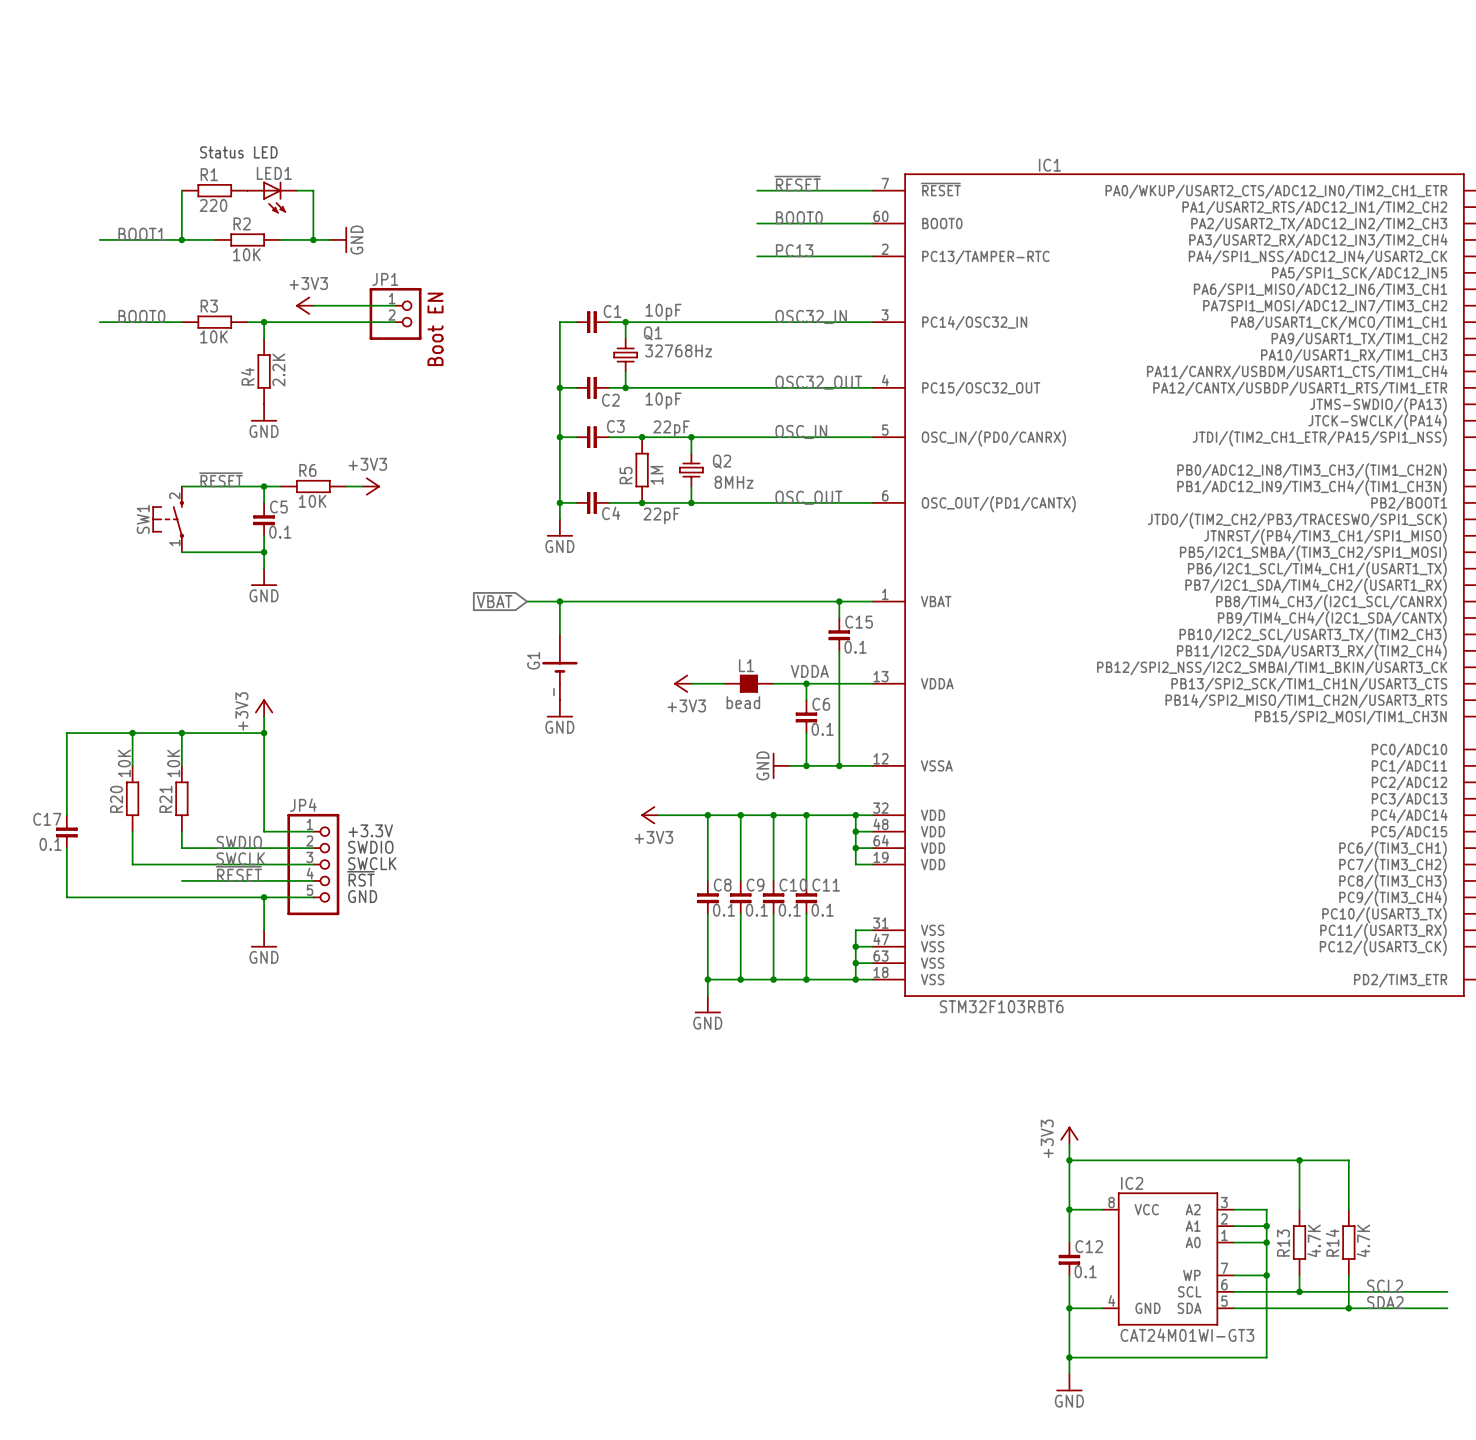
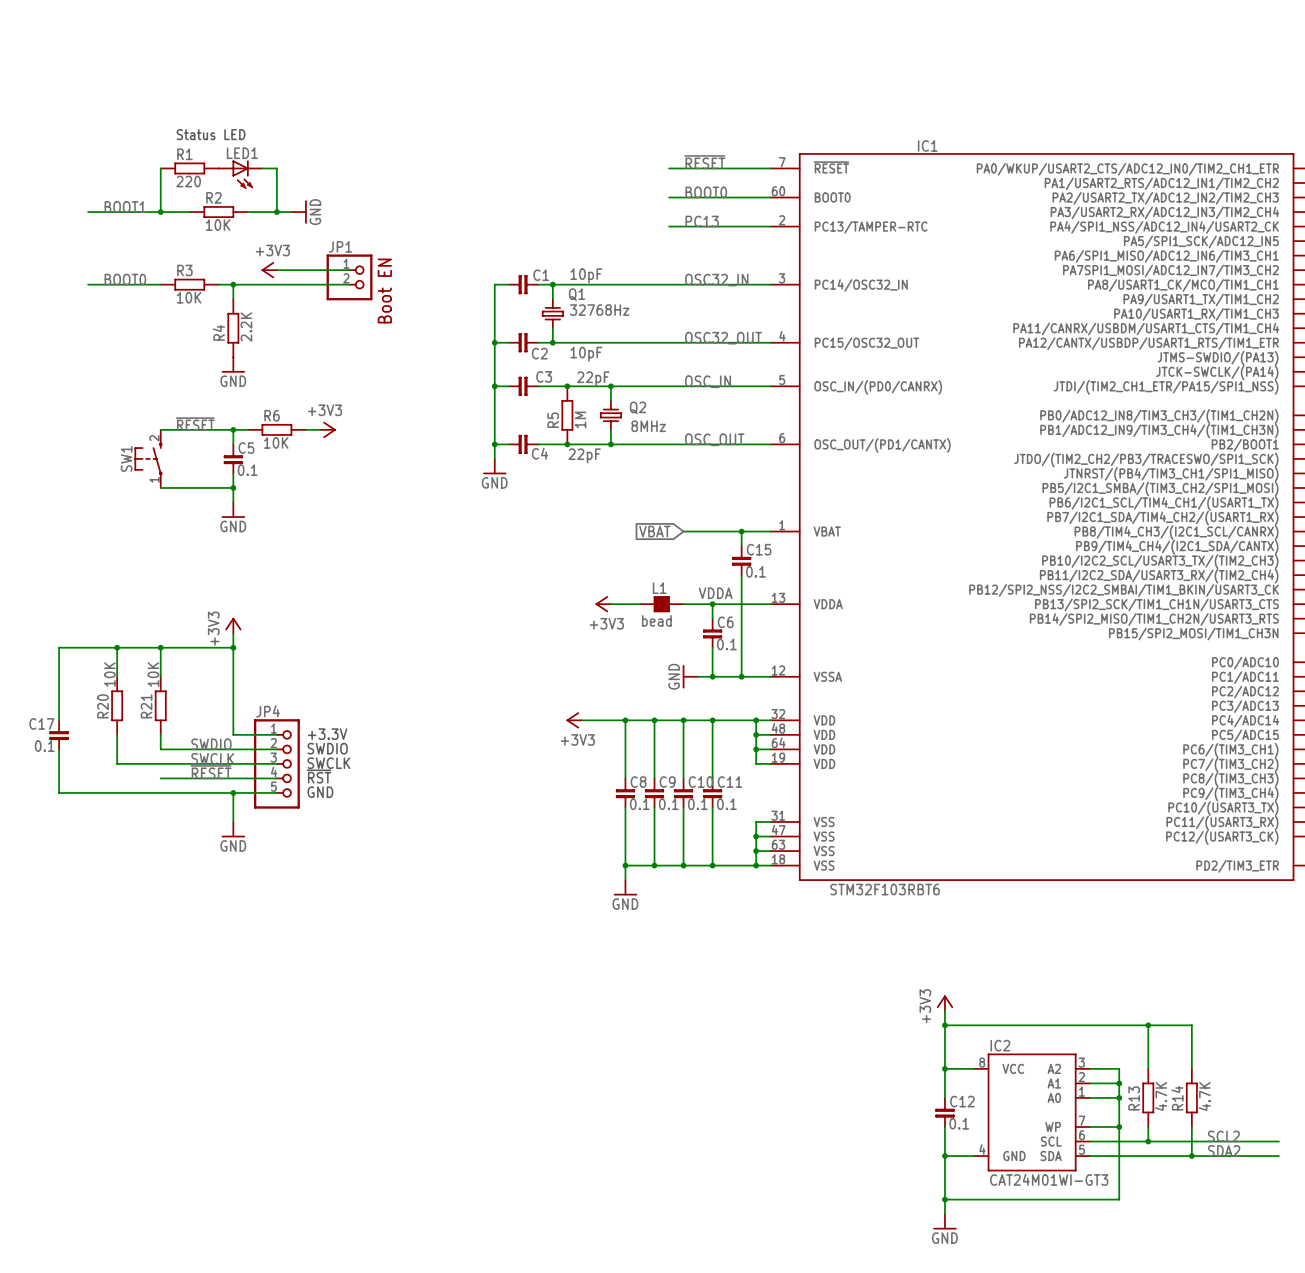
global label: VBAT (494, 601) -> none
wire: (527, 601) (773, 601) -> none
wire: (559, 601) (559, 634) -> none
junction: (559, 601) -> none
global label: none -> VBAT (654, 531)
G1: (559, 667) -> none
power symbol: GND (559, 708) -> none

